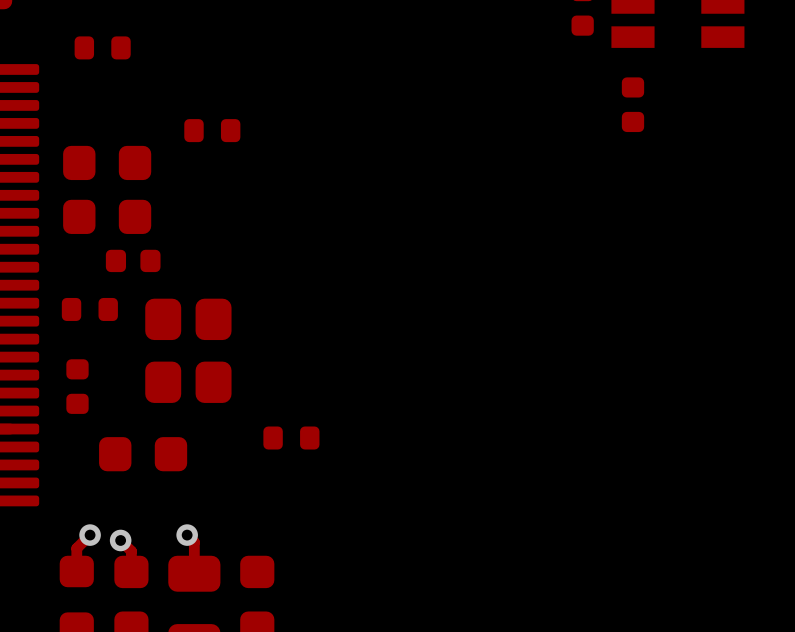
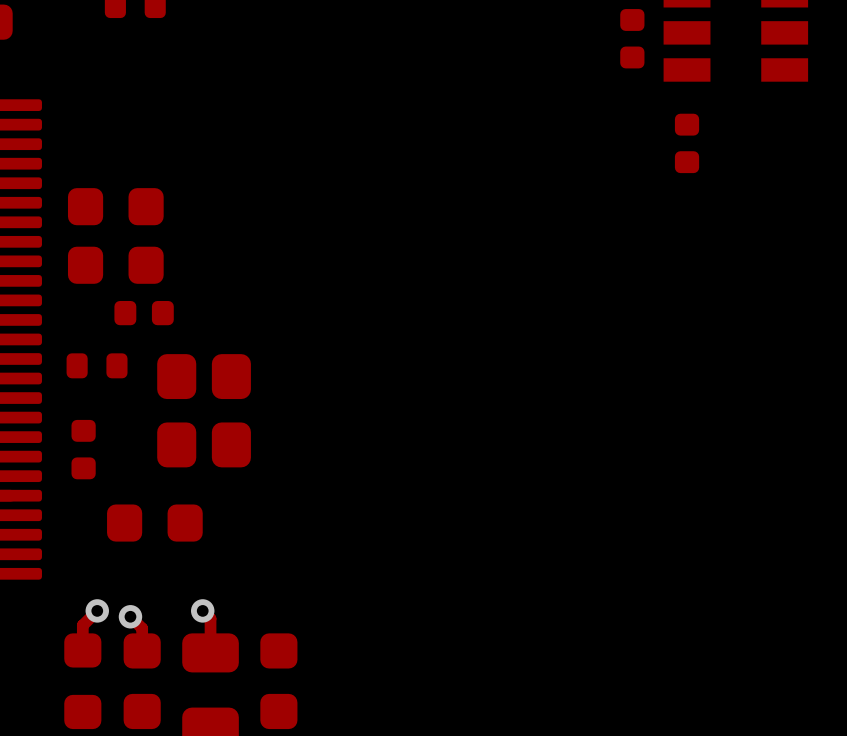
part: (102, 47) -> none
part: (212, 130) -> none
part: (291, 438) -> none

